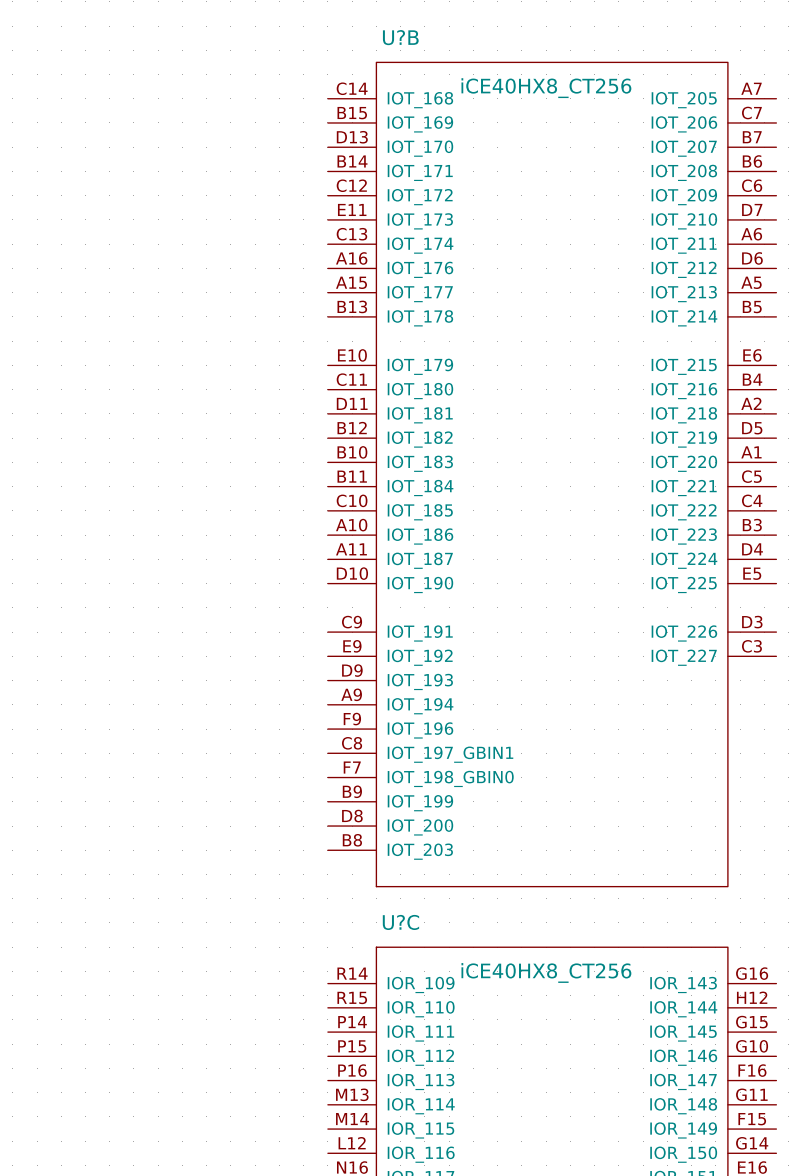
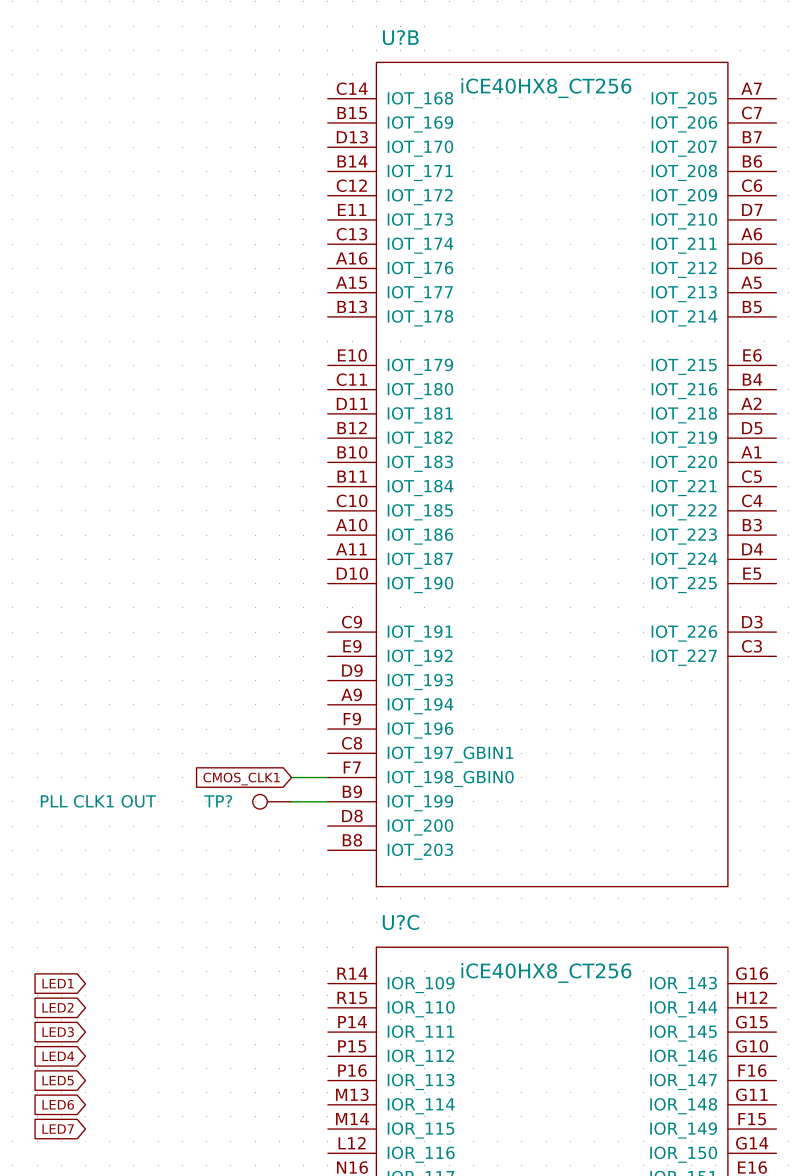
wire: none -> (291, 777) (327, 777)
global label: none -> CMOS_CLK1 (241, 778)
TP?: none -> PLL CLK1 OUT (272, 801)
wire: none -> (291, 801) (327, 801)
global label: none -> LED1 (58, 983)
global label: none -> LED2 (58, 1007)
global label: none -> LED3 (58, 1032)
global label: none -> LED4 (58, 1056)
global label: none -> LED5 (58, 1080)
global label: none -> LED6 (58, 1104)
global label: none -> LED7 (58, 1129)

